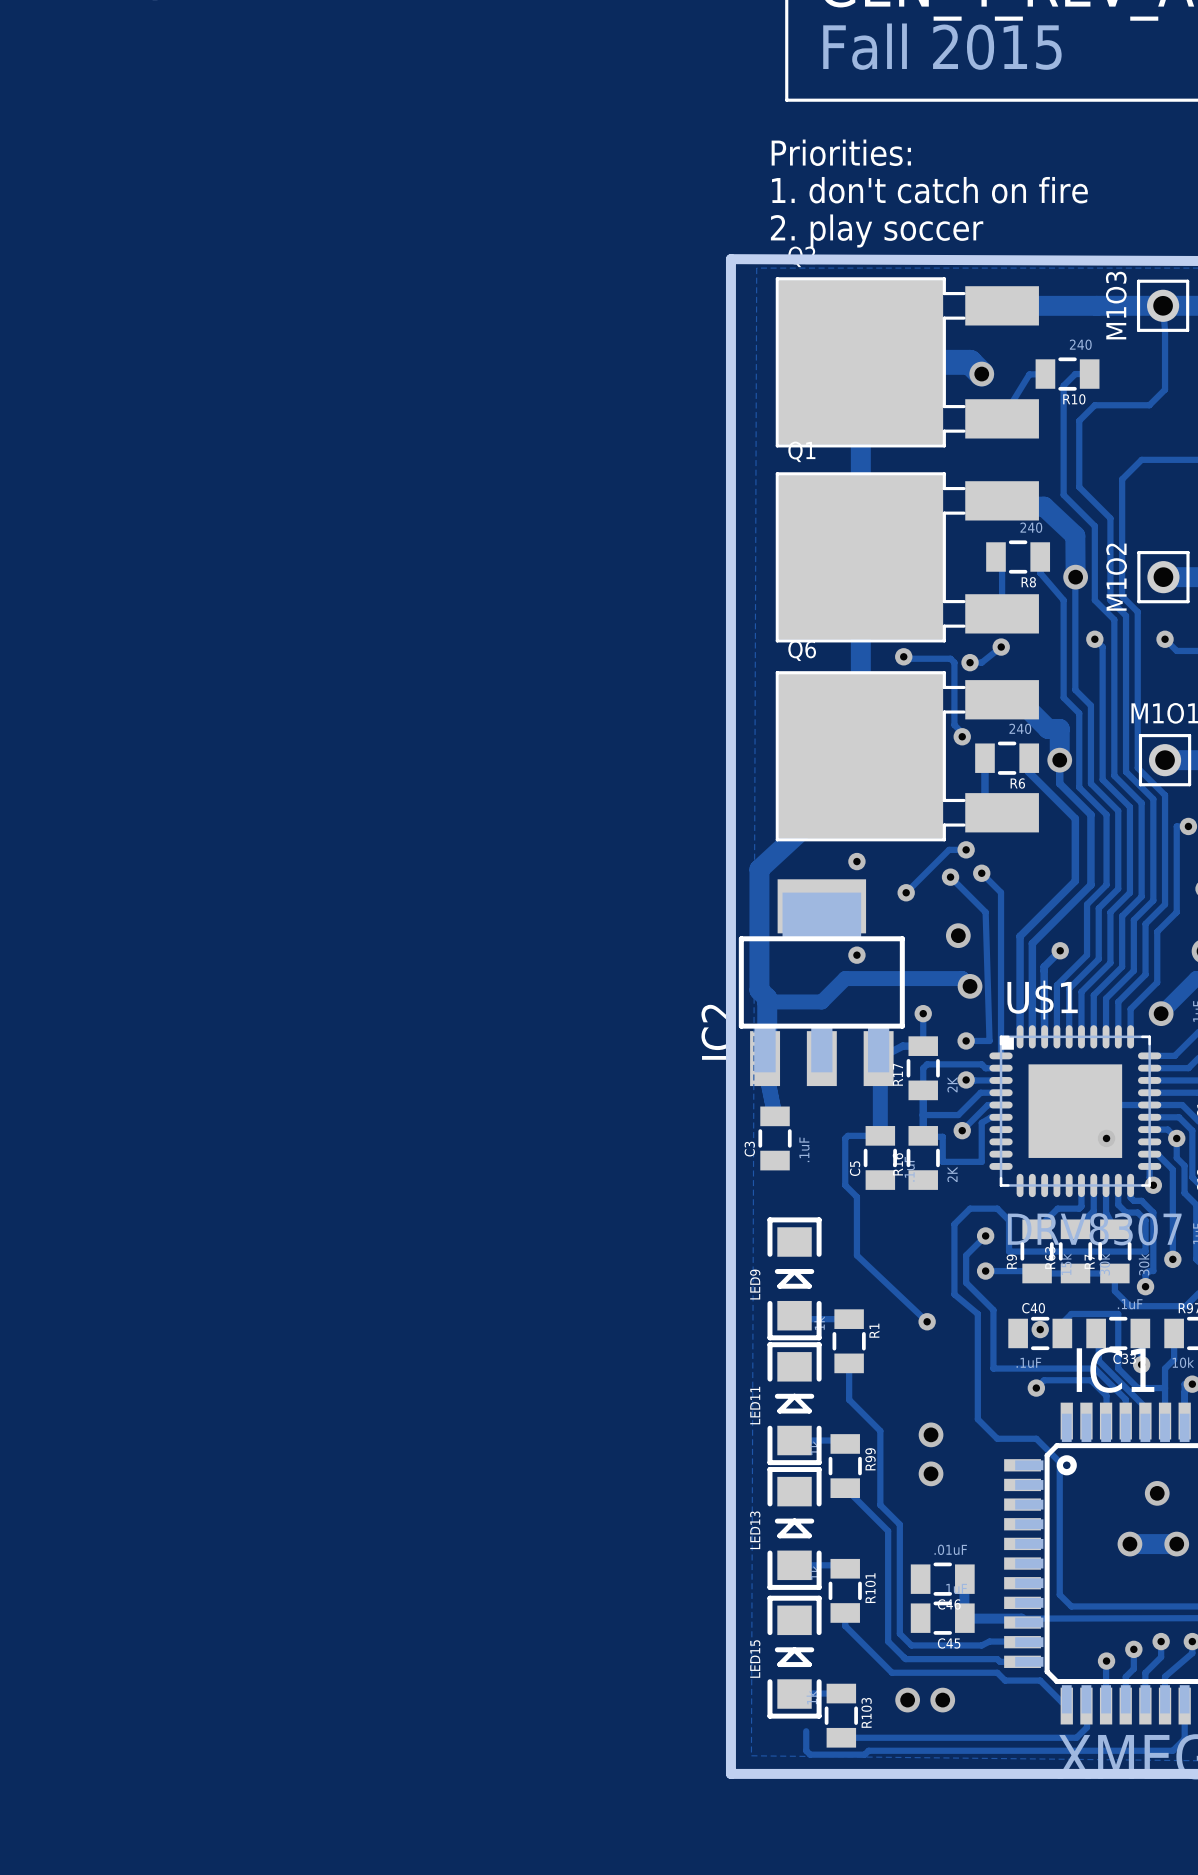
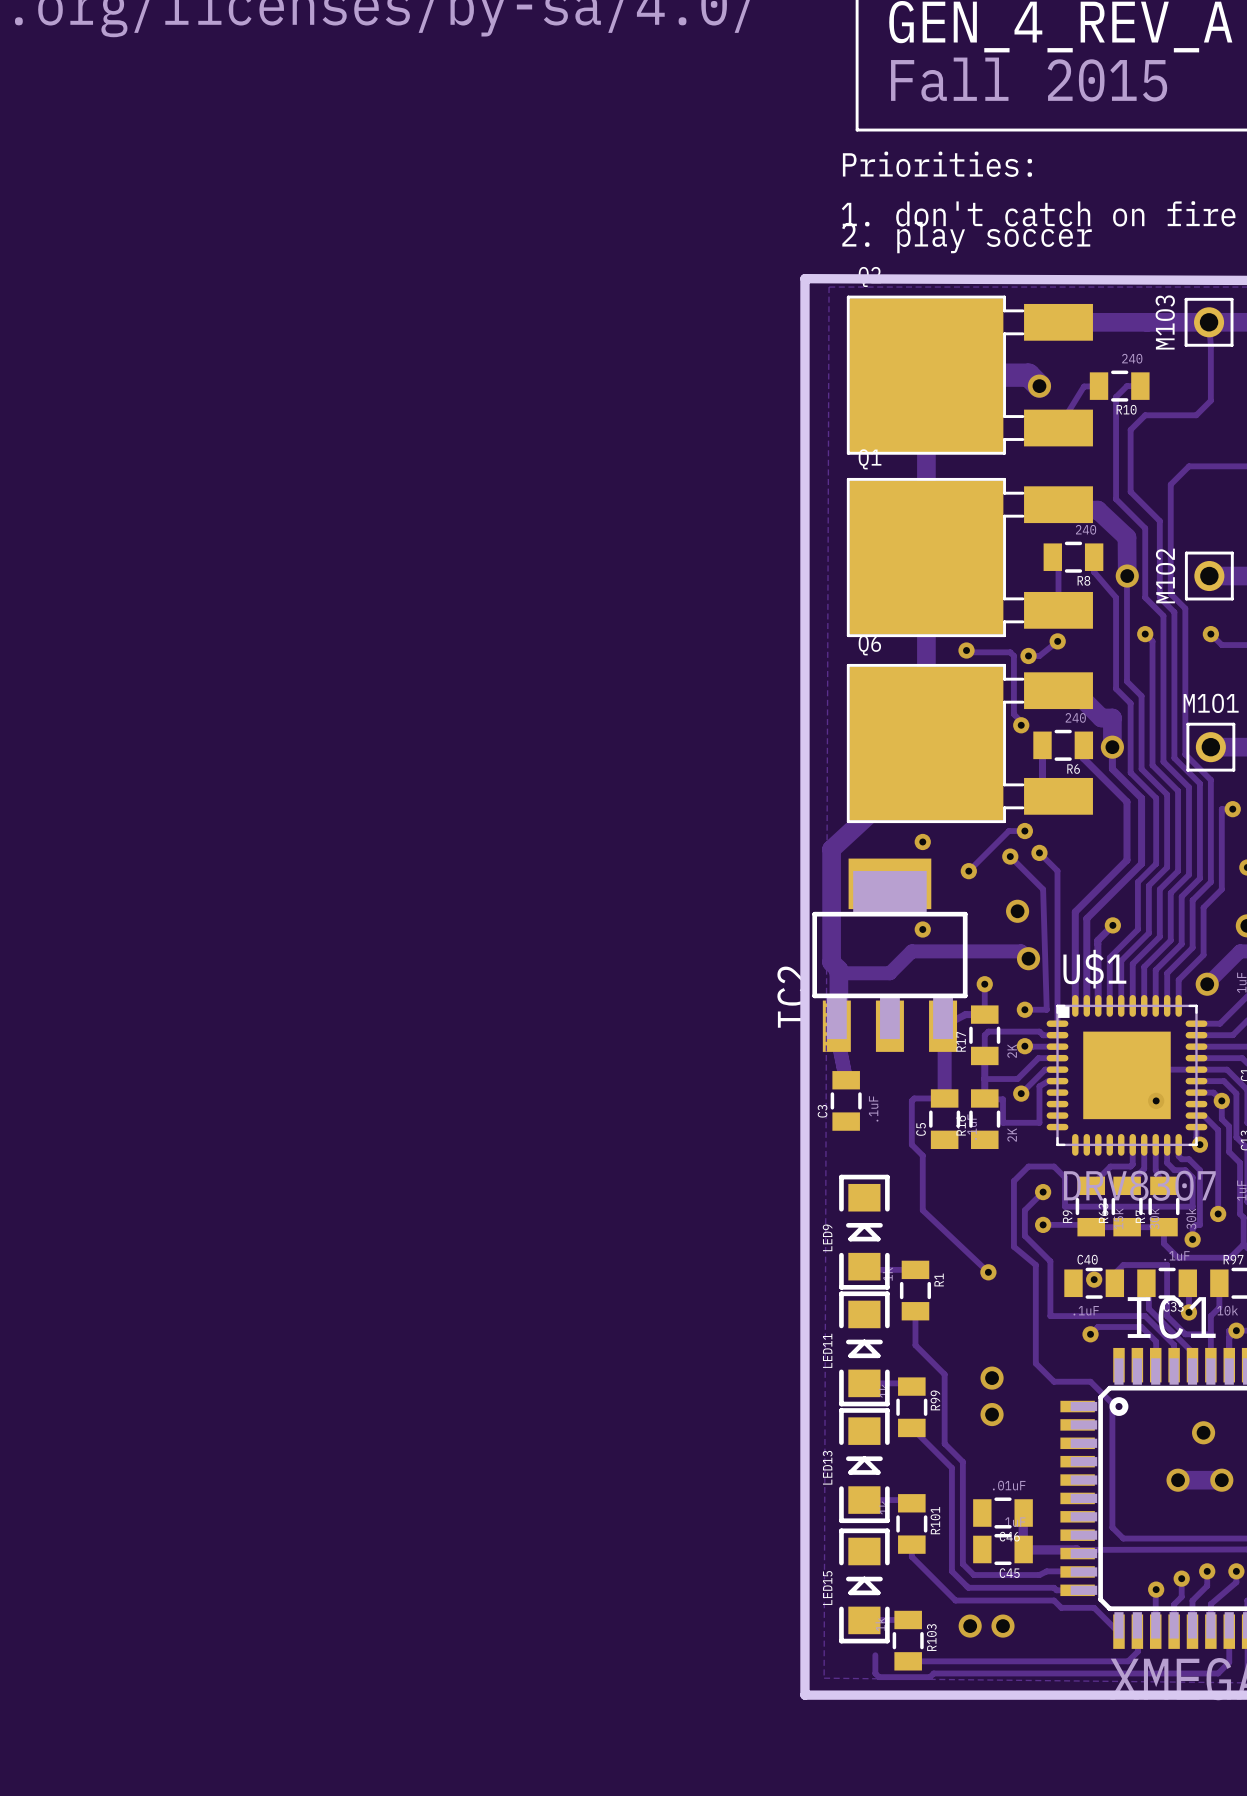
text position: Priorities: (841, 152) -> Priorities: (937, 164)
text position: 2. play soccer (877, 230) -> 2. play soccer (966, 237)

